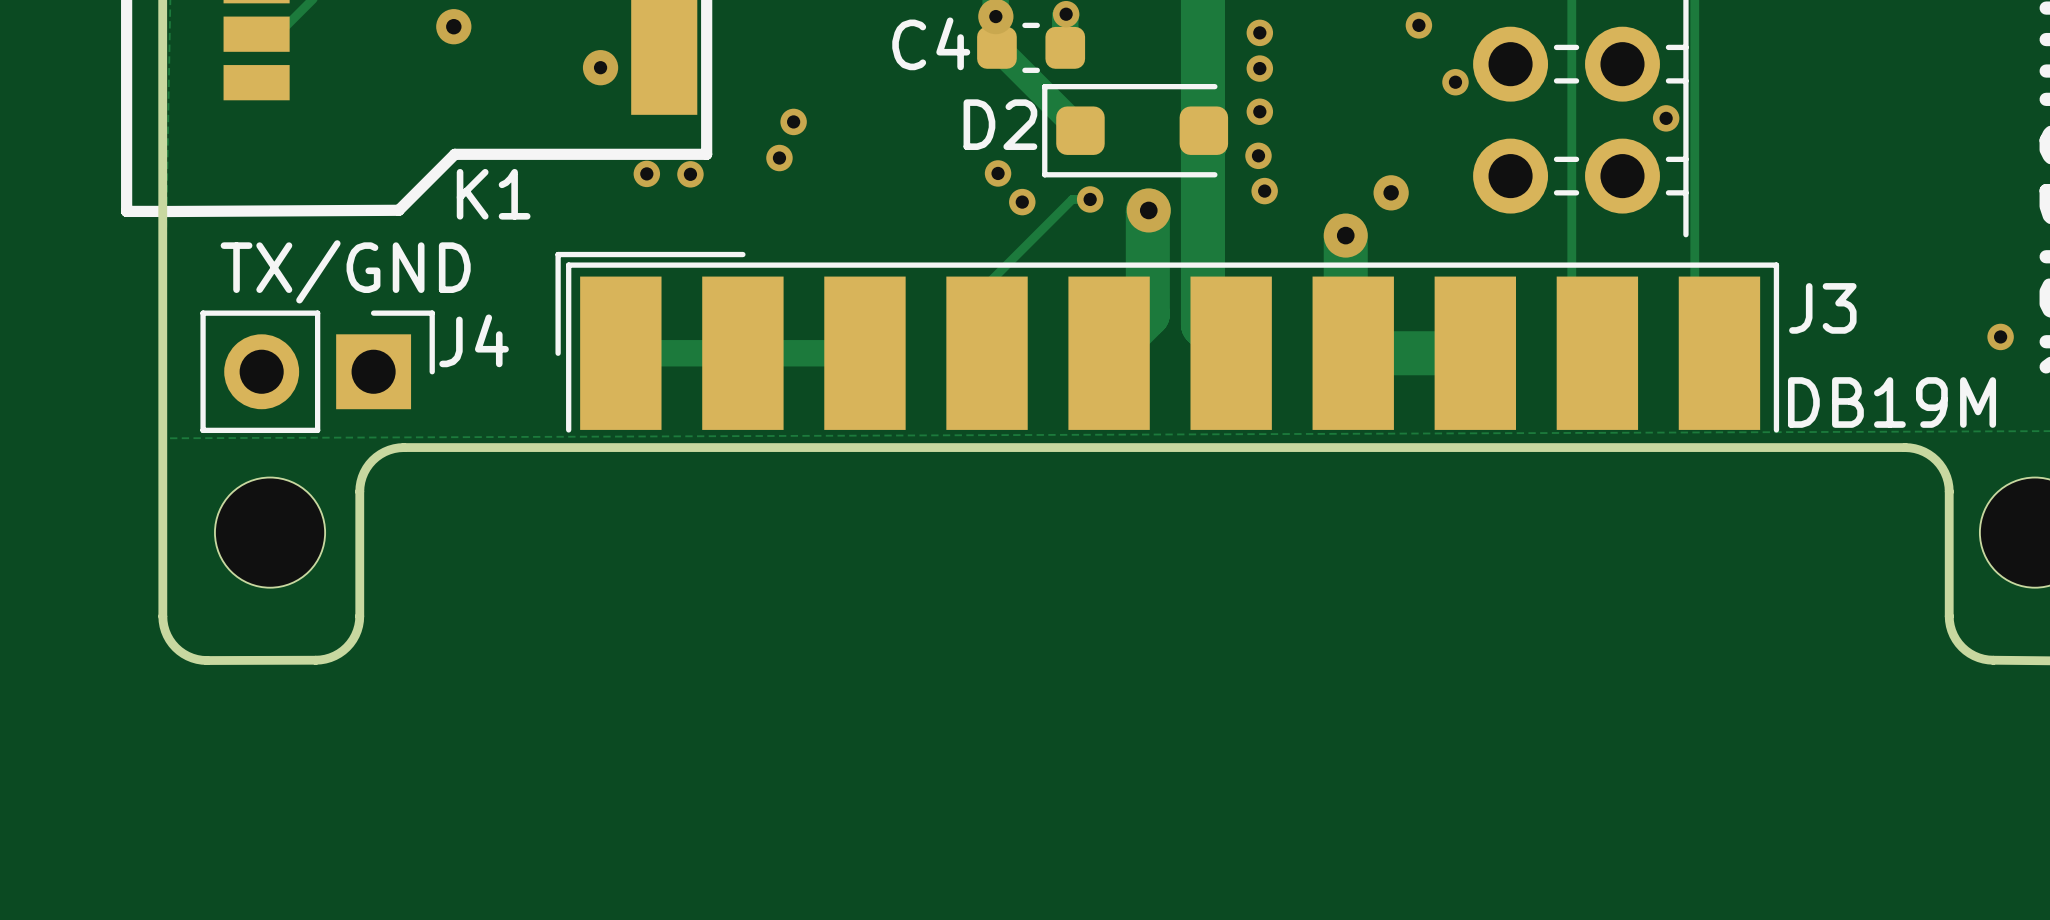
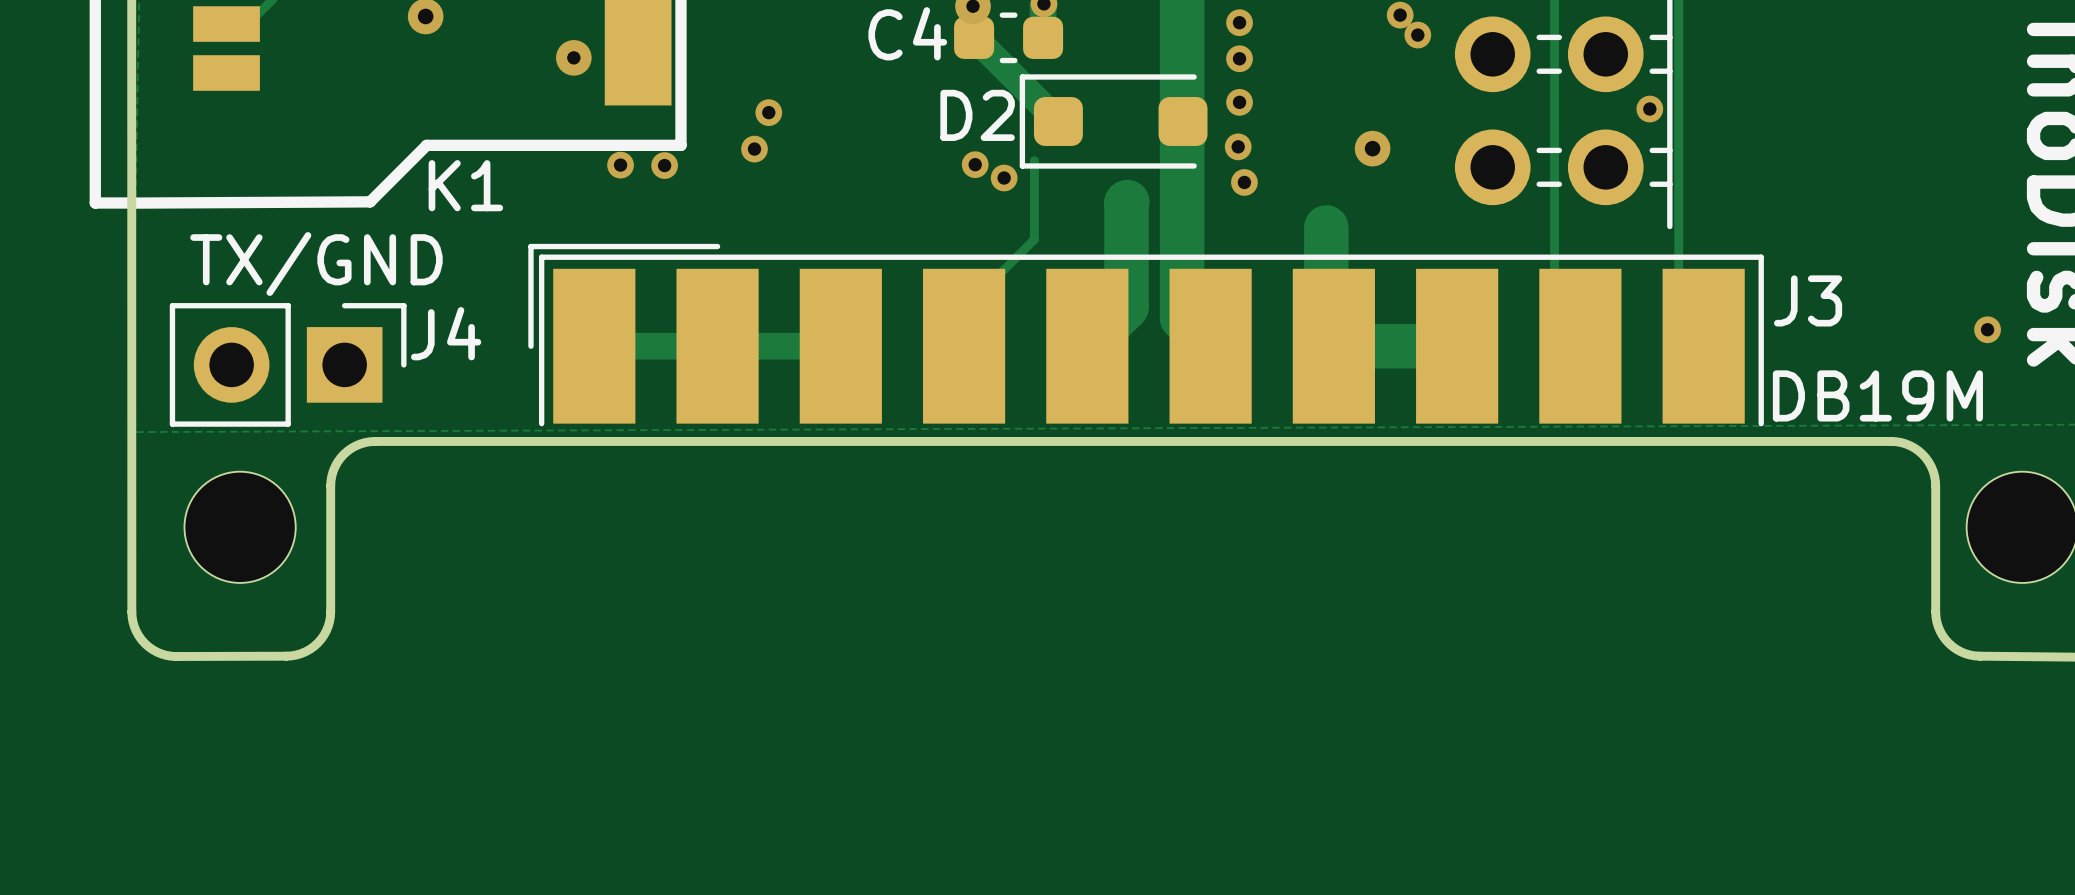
via position: (1455, 82) -> (1417, 35)
track: none -> (1034, 160) (1034, 239) (981, 292)
via position: (1391, 192) -> (1372, 148)
track: (1090, 199) (1072, 199) (987, 284) (987, 353) -> none
via: (1090, 199) -> none
via position: (1022, 202) -> (1004, 178)
via: (1148, 210) -> none
via: (1345, 235) -> none

